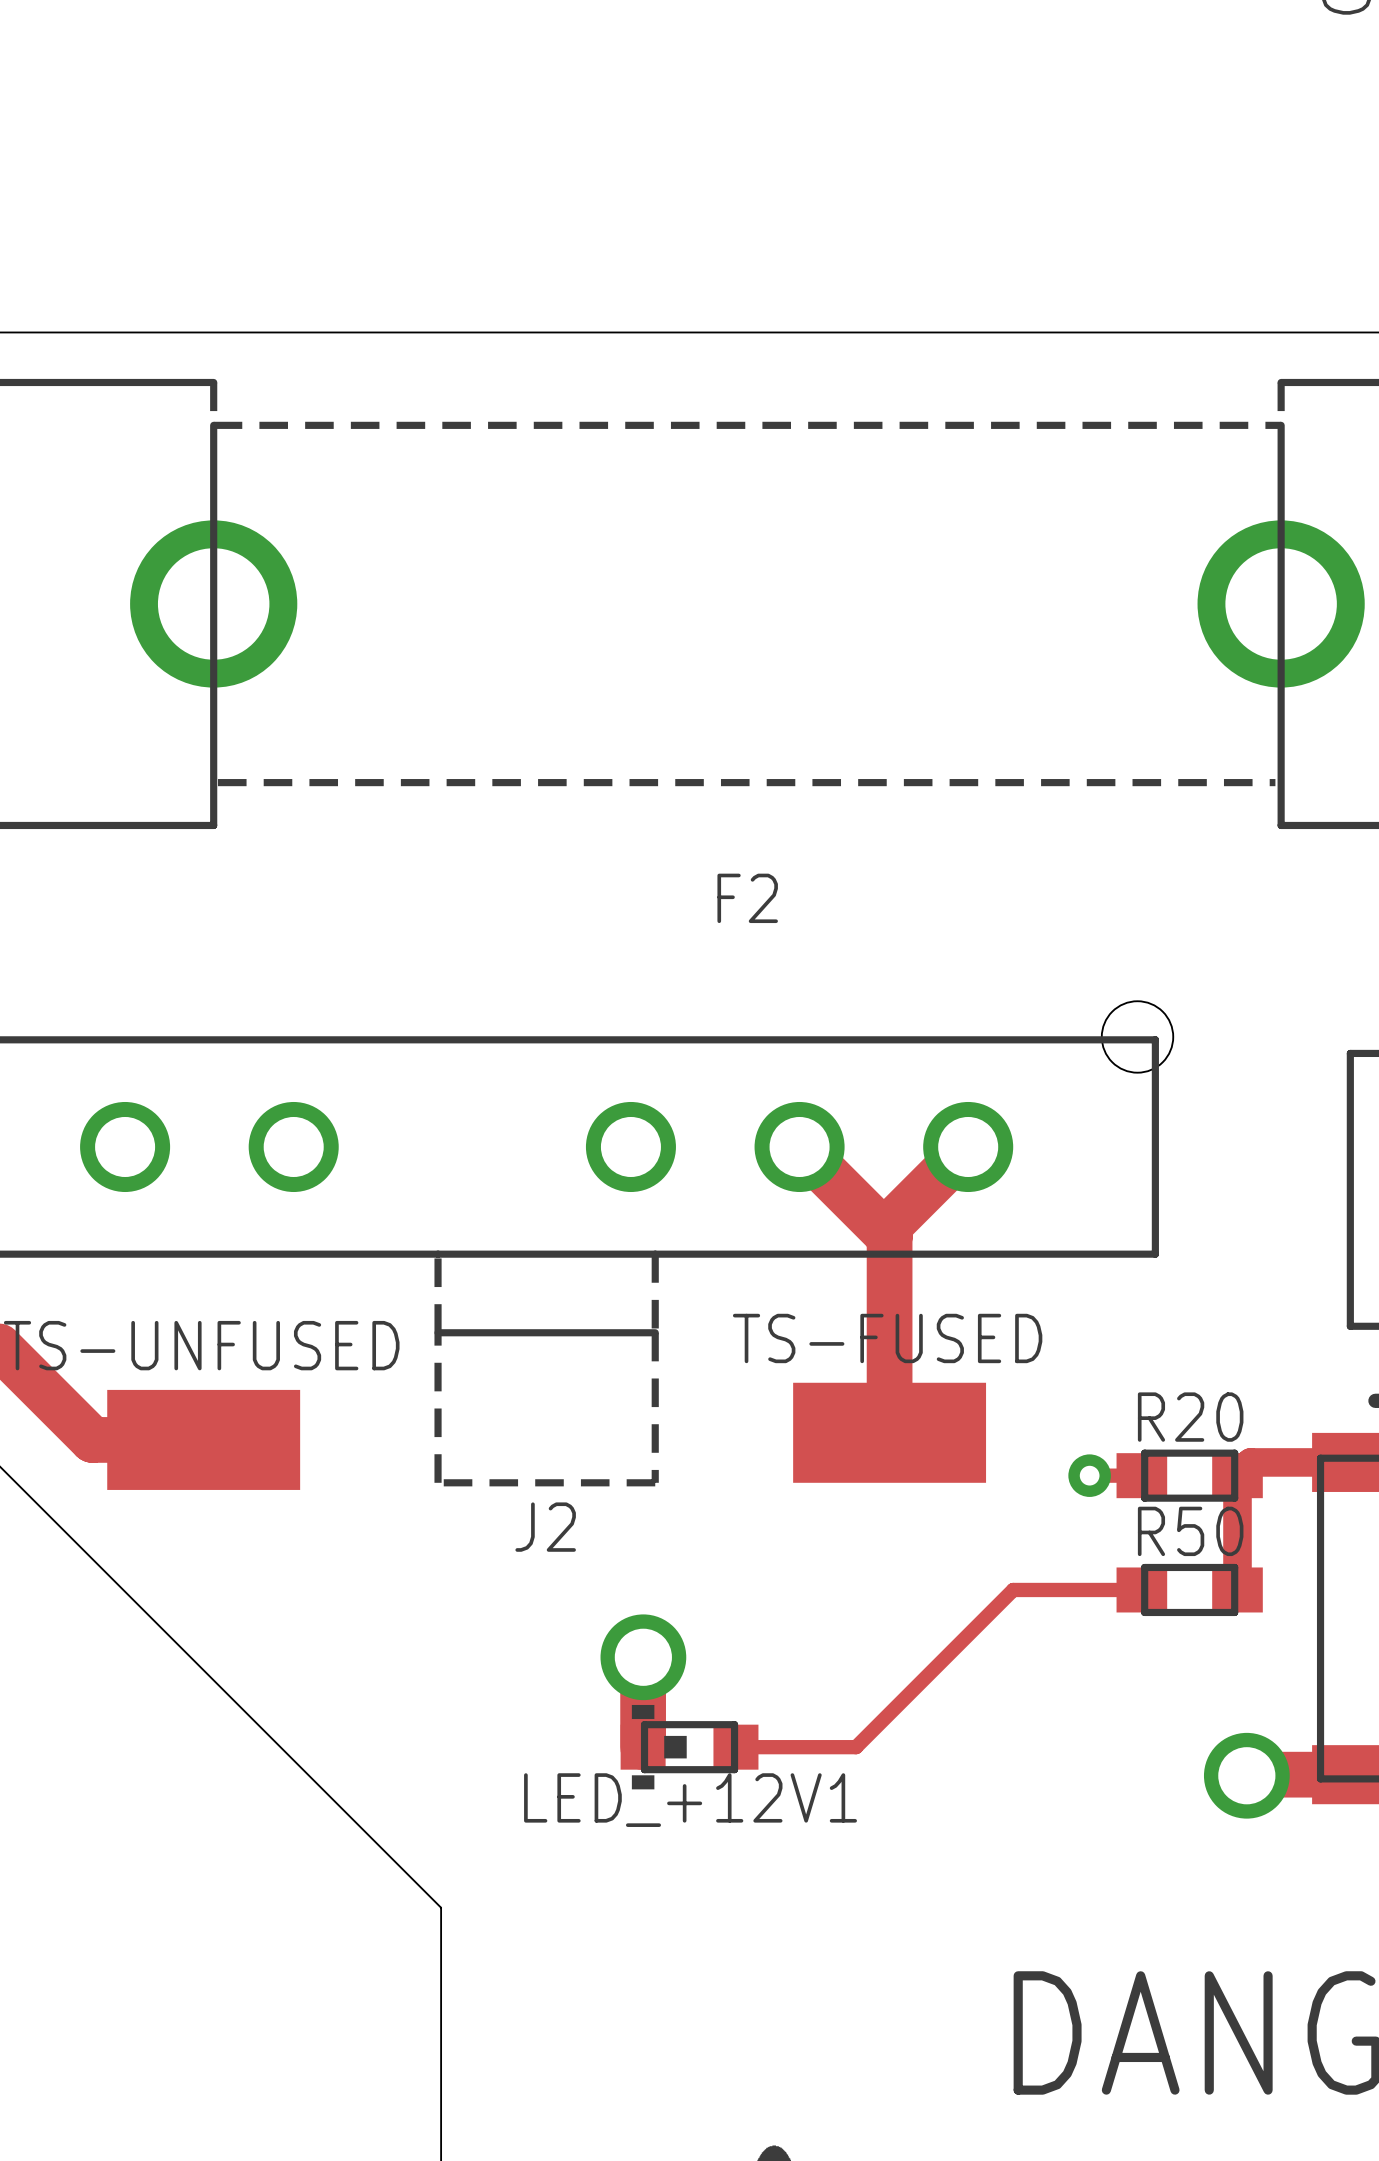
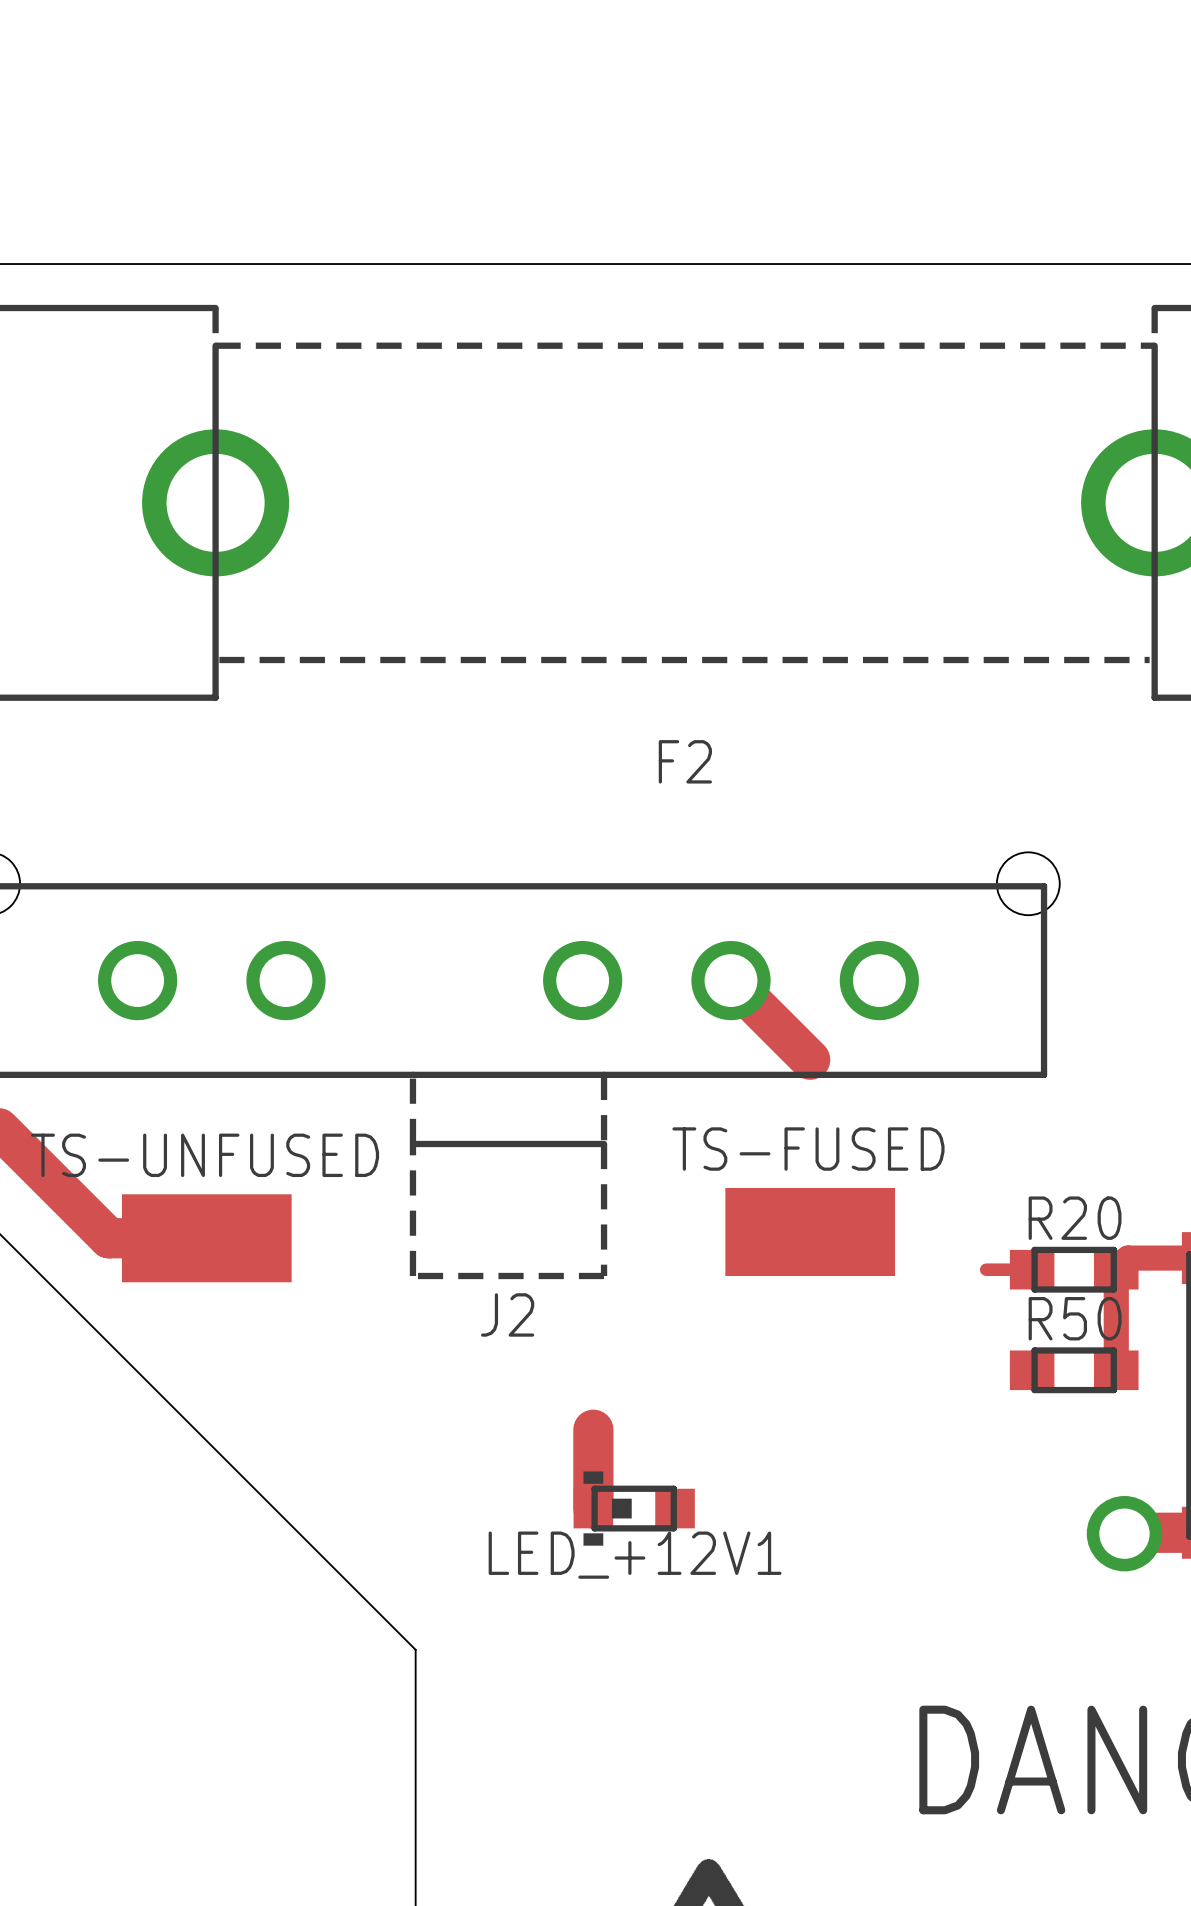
track: (968, 1146) (889, 1225) (889, 1432) -> none
via: (1089, 1475) -> none
track: (1141, 1589) (1013, 1589) (856, 1747) (735, 1747) -> none
via: (643, 1657) -> none

